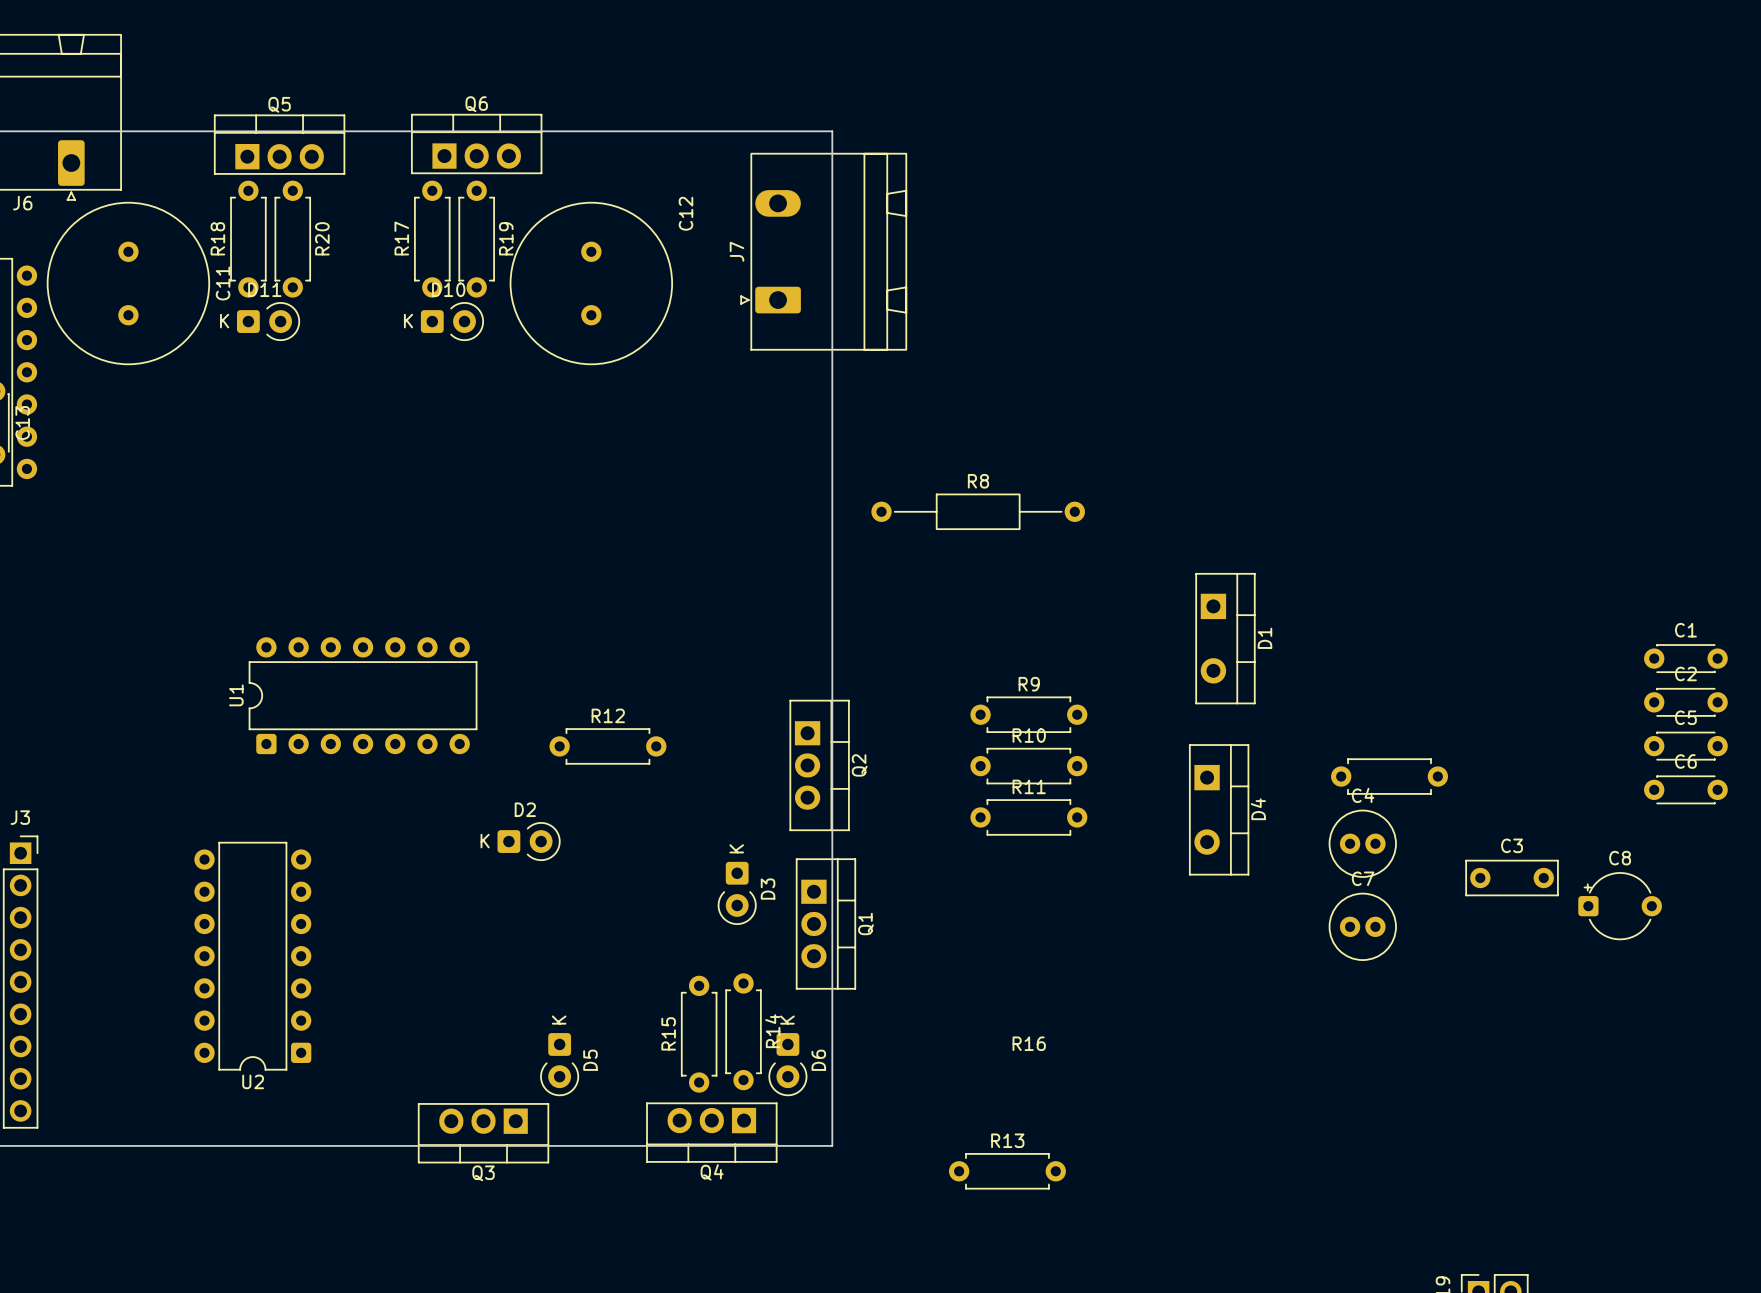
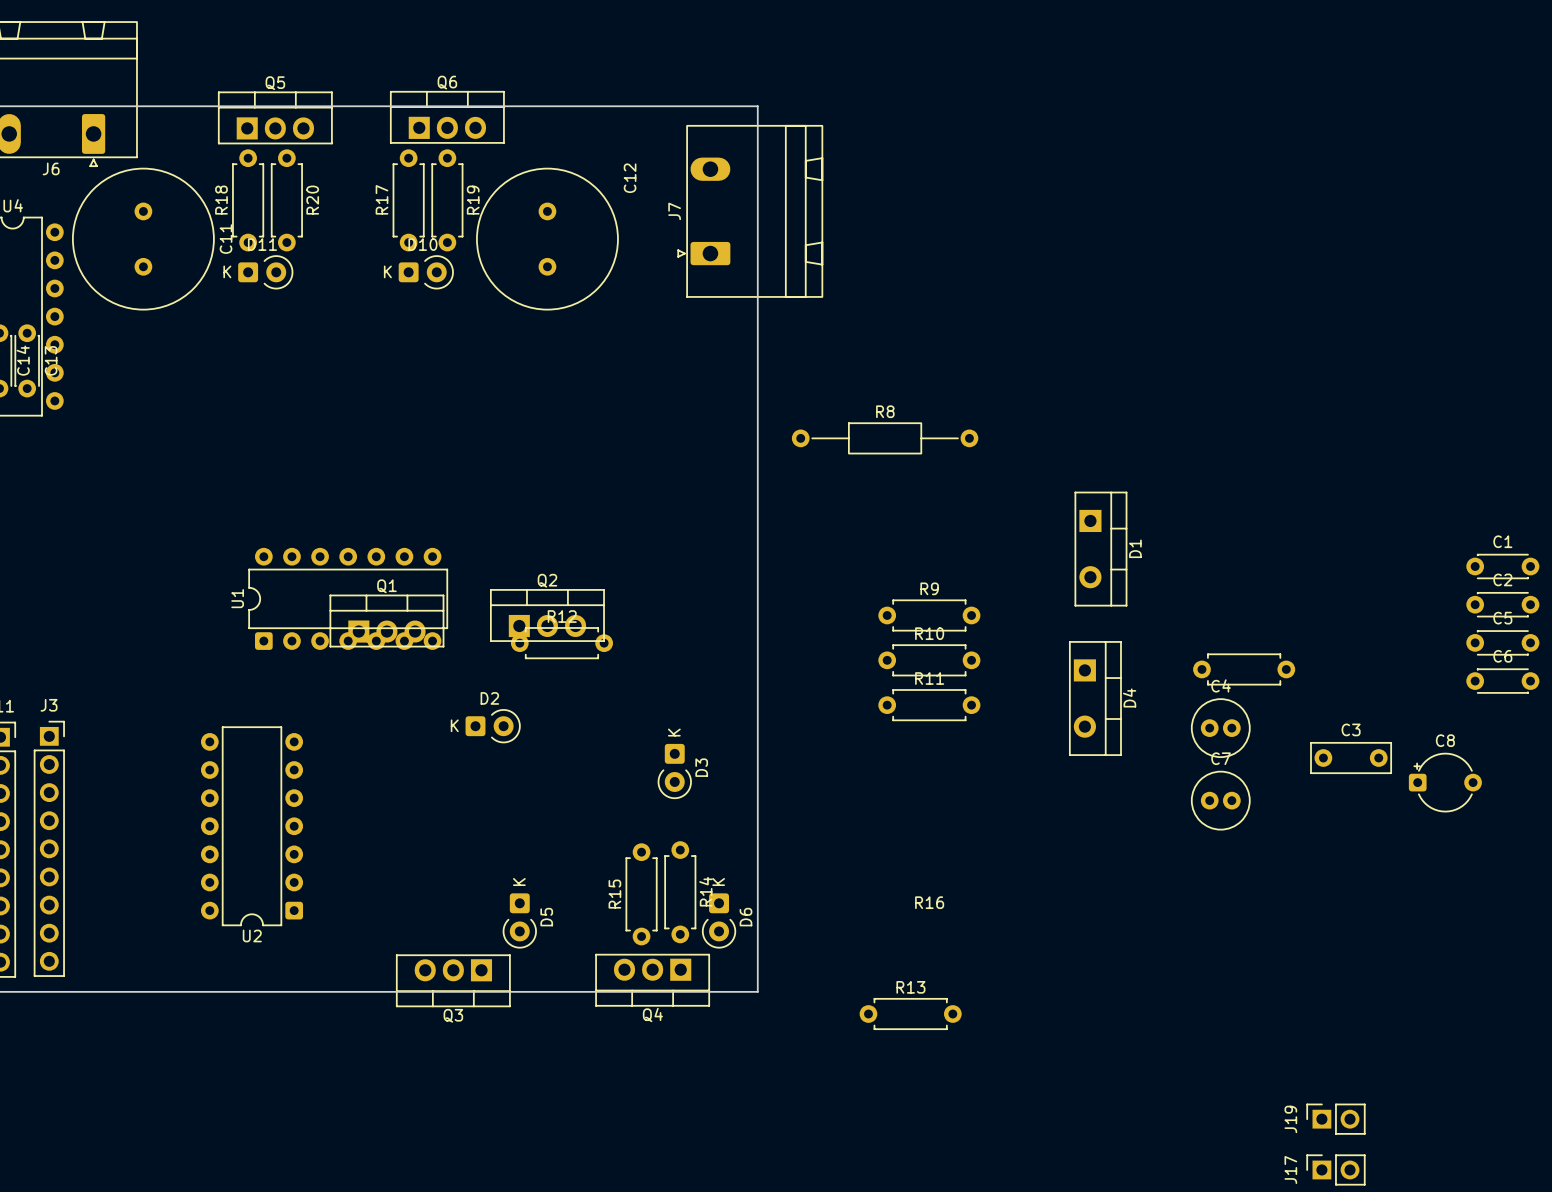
Q2 rotation: 0° (819, 765) -> 90° counterclockwise (547, 615)
Q2 position: (819, 765) -> (547, 615)
Q1 rotation: 0° (825, 923) -> 90° counterclockwise (386, 621)
Q1 position: (825, 923) -> (386, 621)

